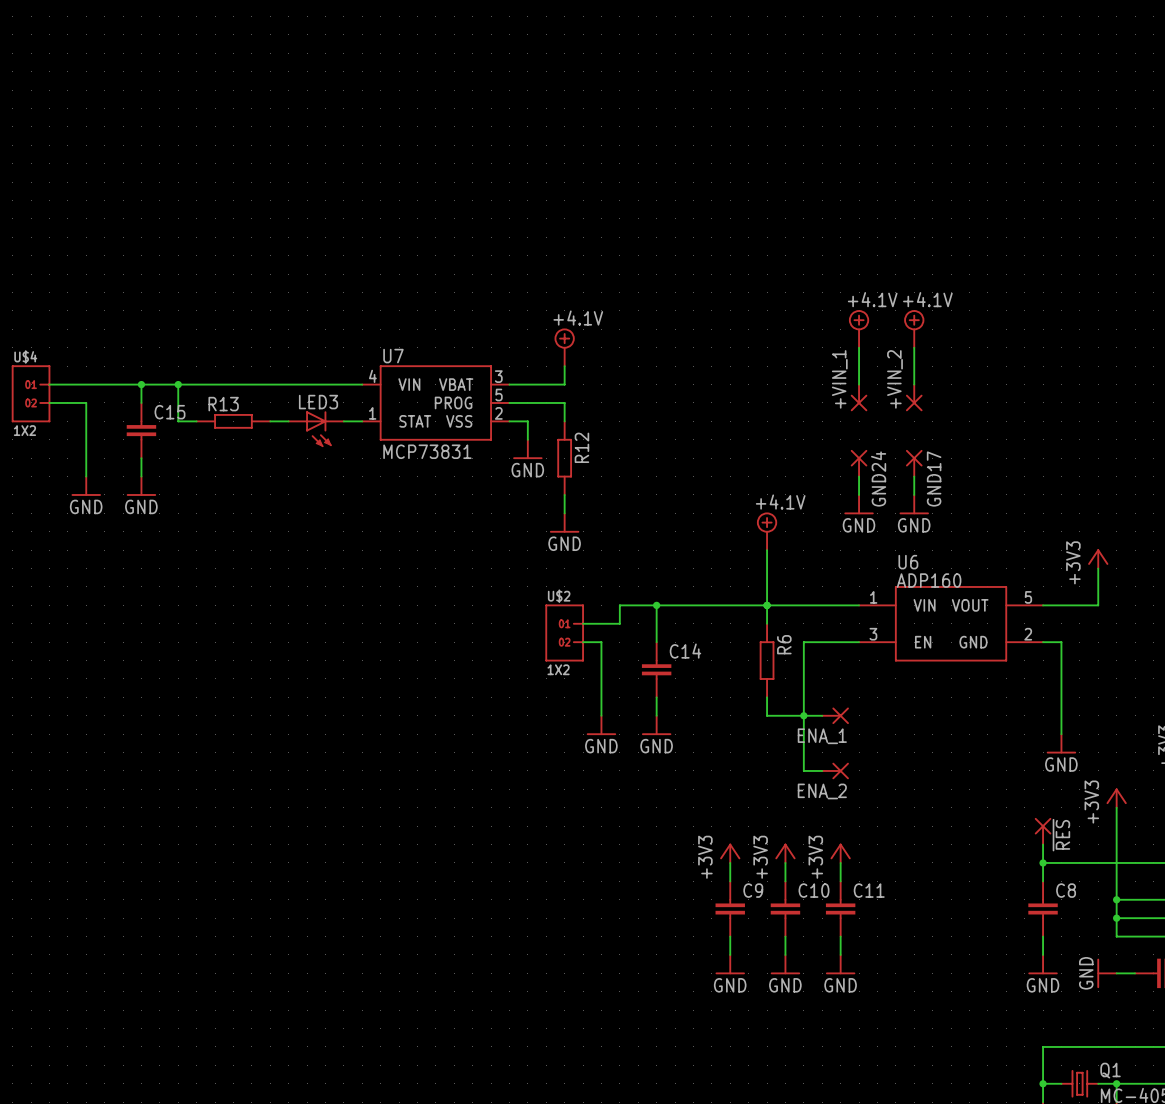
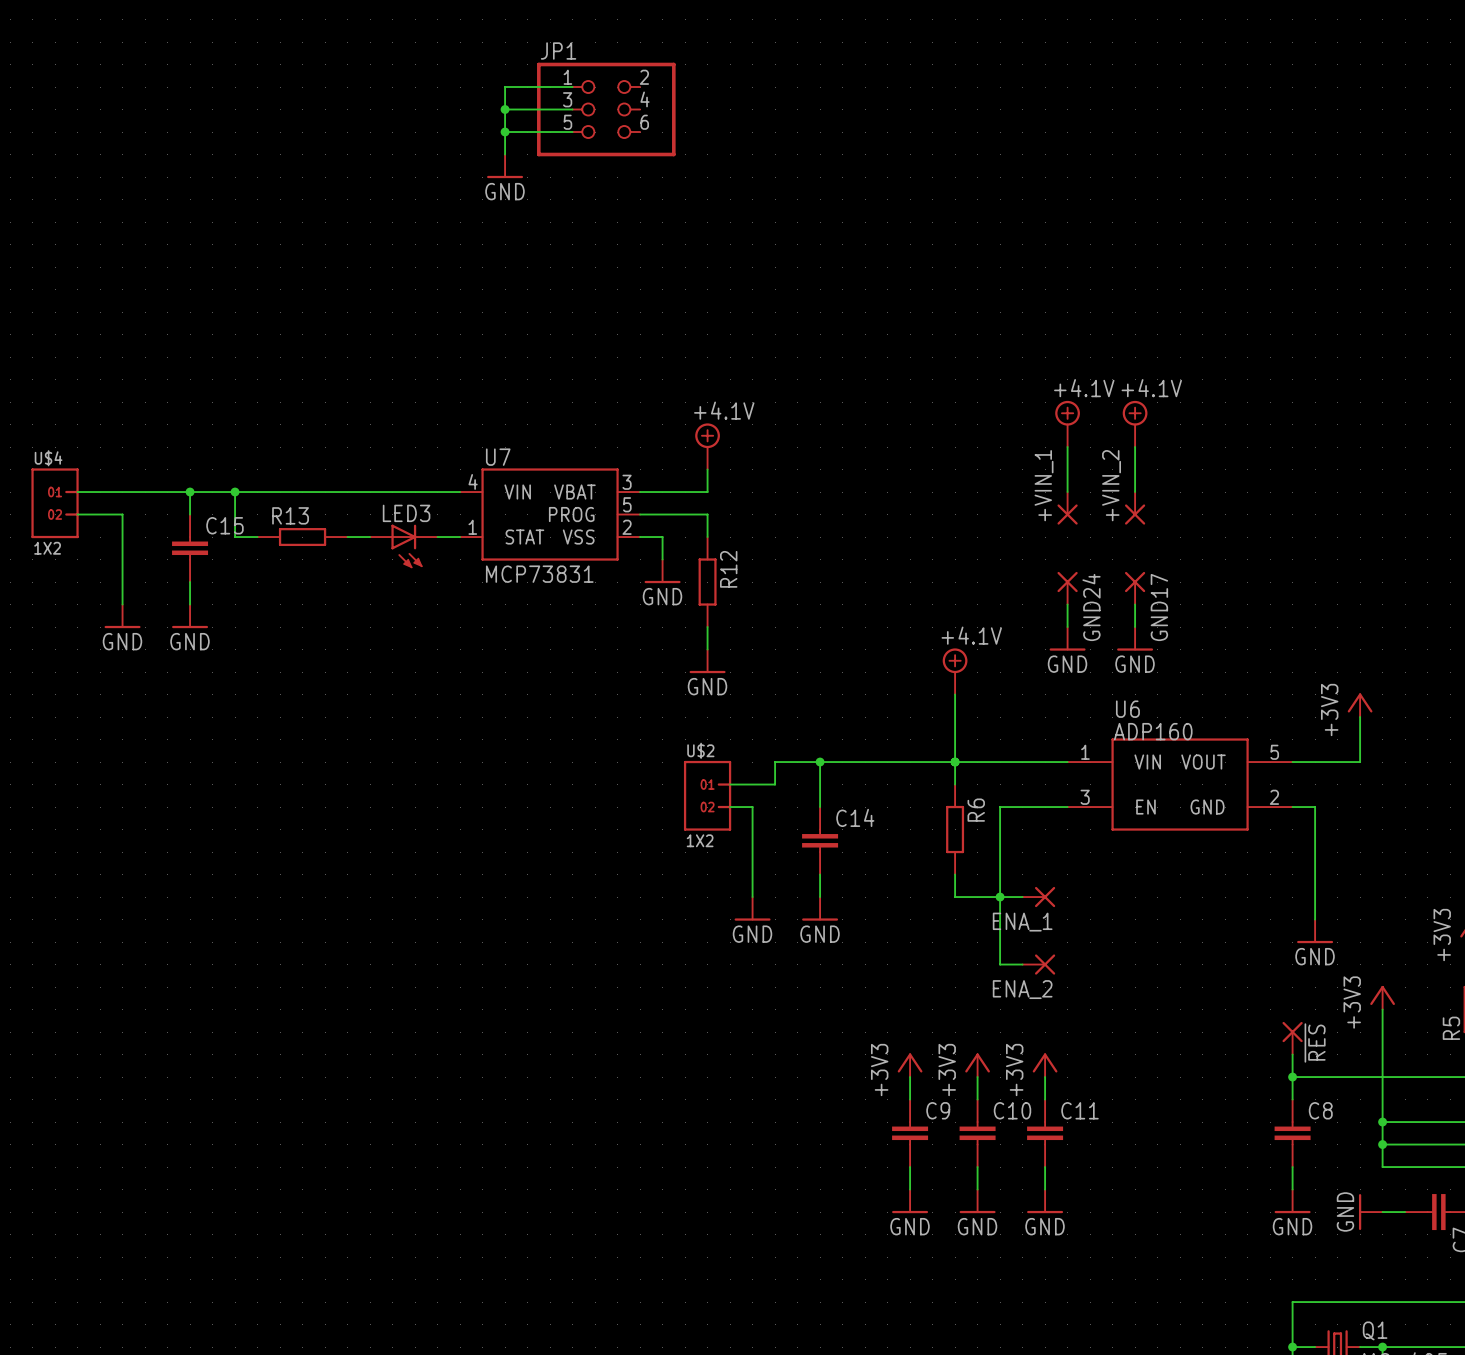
wire: none -> (572, 87) (505, 87) (505, 154)
wire: none -> (505, 109) (572, 109)
junction: none -> (505, 109)
JP1: none -> (606, 109)
wire: none -> (505, 132) (572, 132)
junction: none -> (505, 132)
power symbol: none -> GND (505, 166)

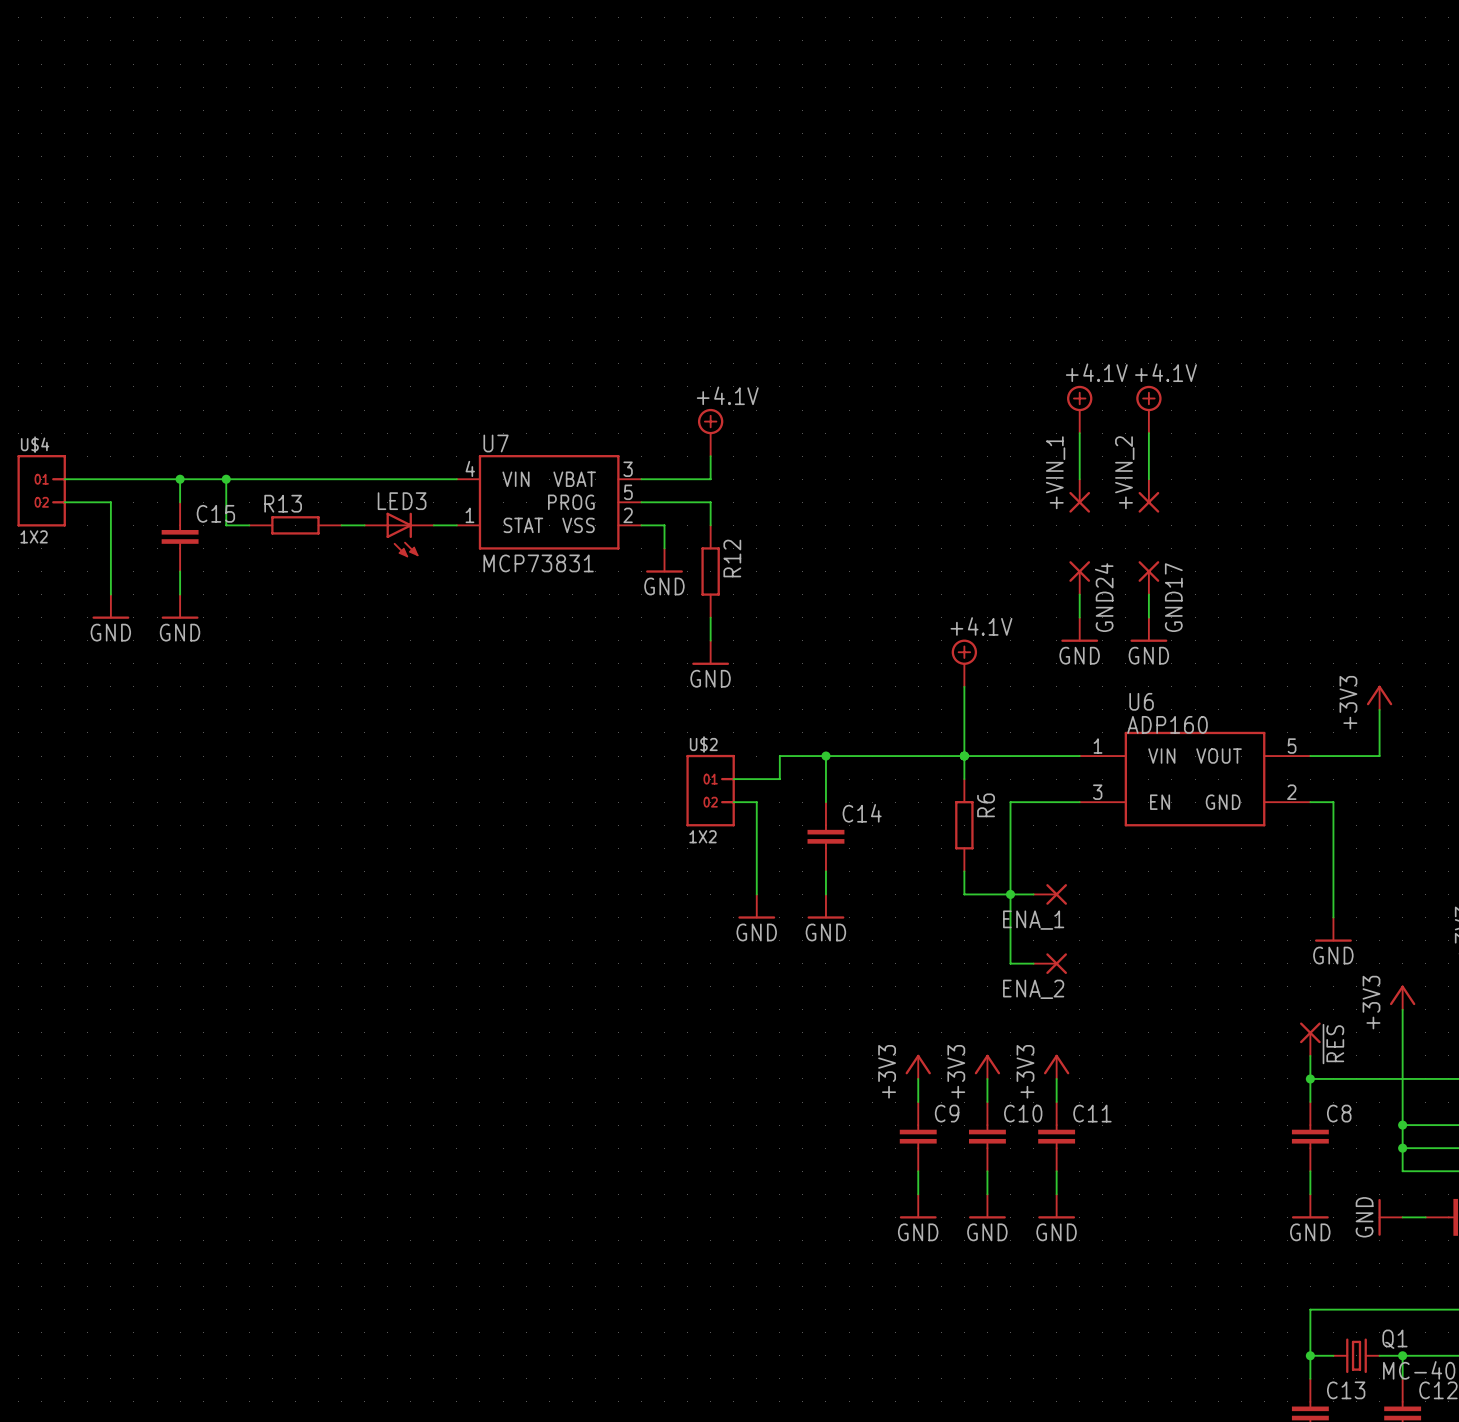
wire: (572, 87) (505, 87) (505, 154) -> none
wire: (505, 109) (572, 109) -> none
junction: (505, 109) -> none
JP1: (606, 109) -> none
wire: (505, 132) (572, 132) -> none
junction: (505, 132) -> none
power symbol: GND (505, 166) -> none

